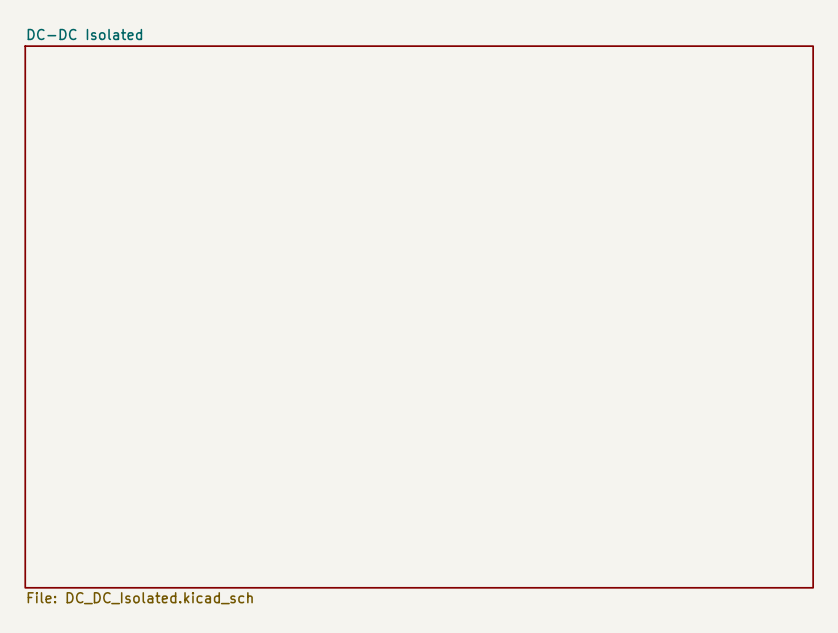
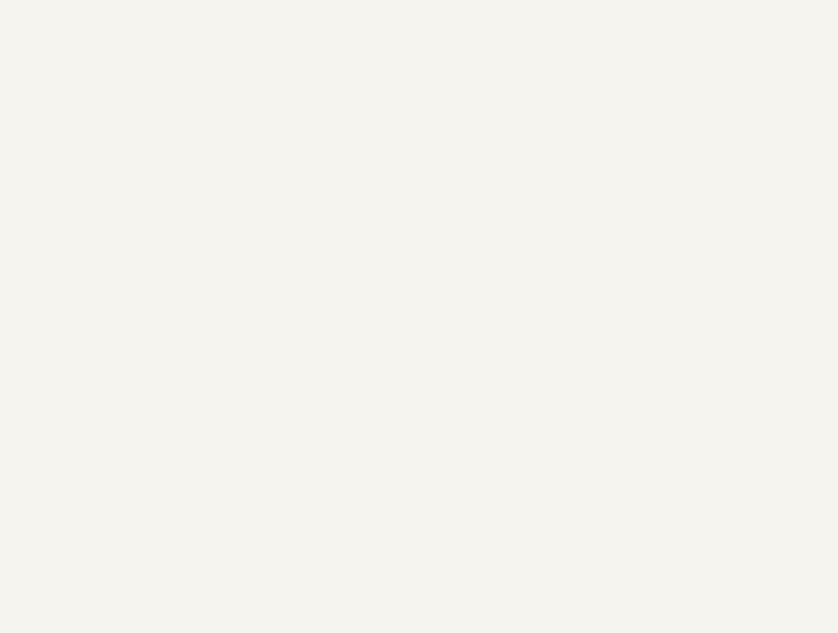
sheet DC-DC Isolated: File: DC_DC_Isolated.kicad_sch (419, 316) -> none

